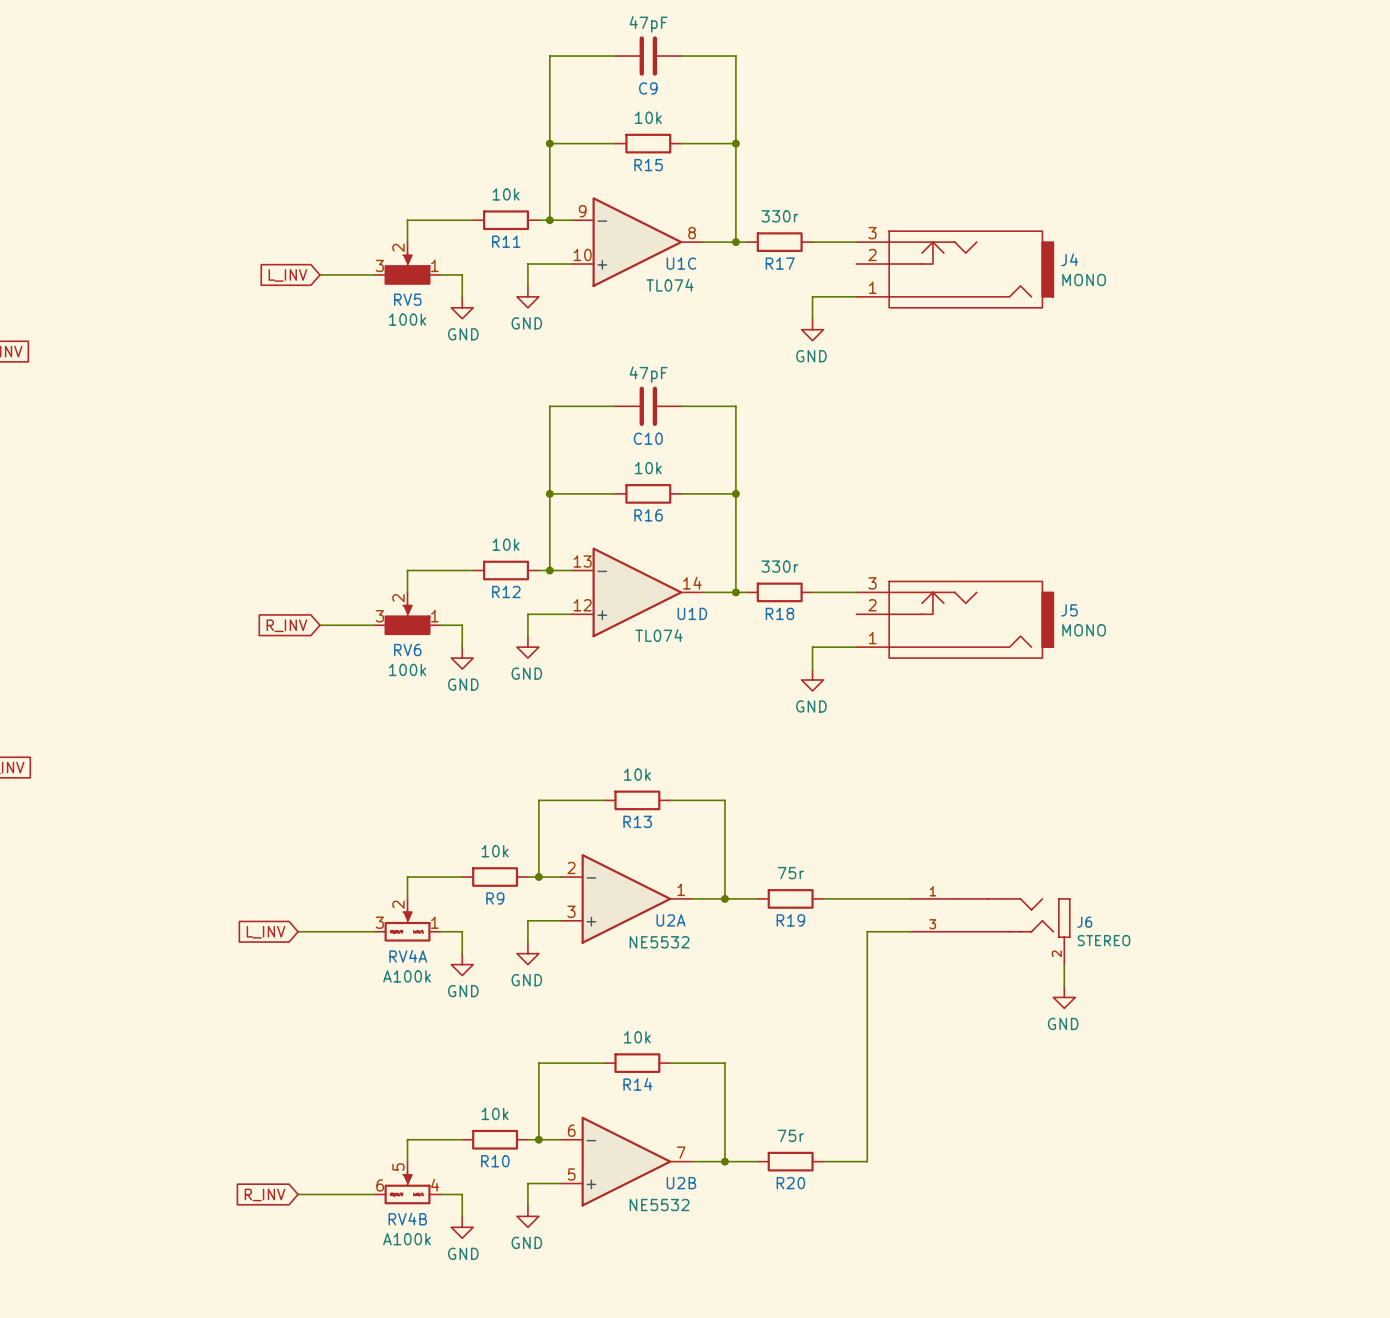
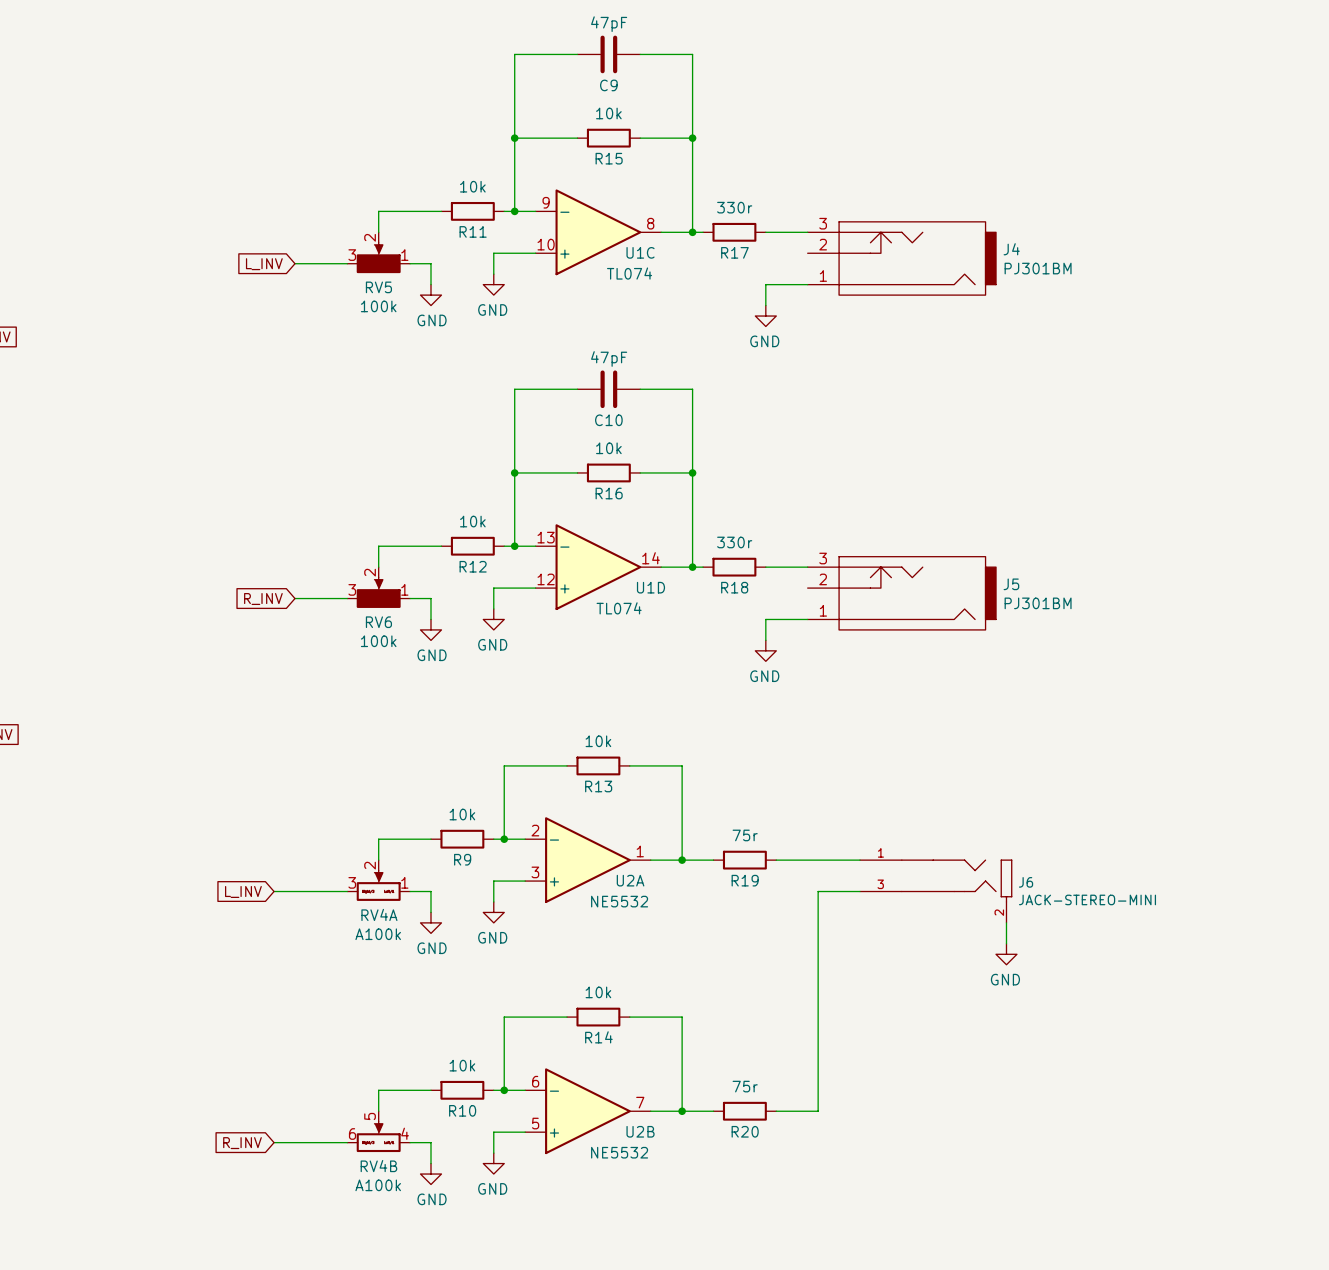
J4 value: MONO (1084, 280) -> PJ301BM (1038, 268)
J5 value: MONO (1084, 630) -> PJ301BM (1038, 603)
J6 value: STEREO (1104, 940) -> JACK-STEREO-MINI (1087, 899)

